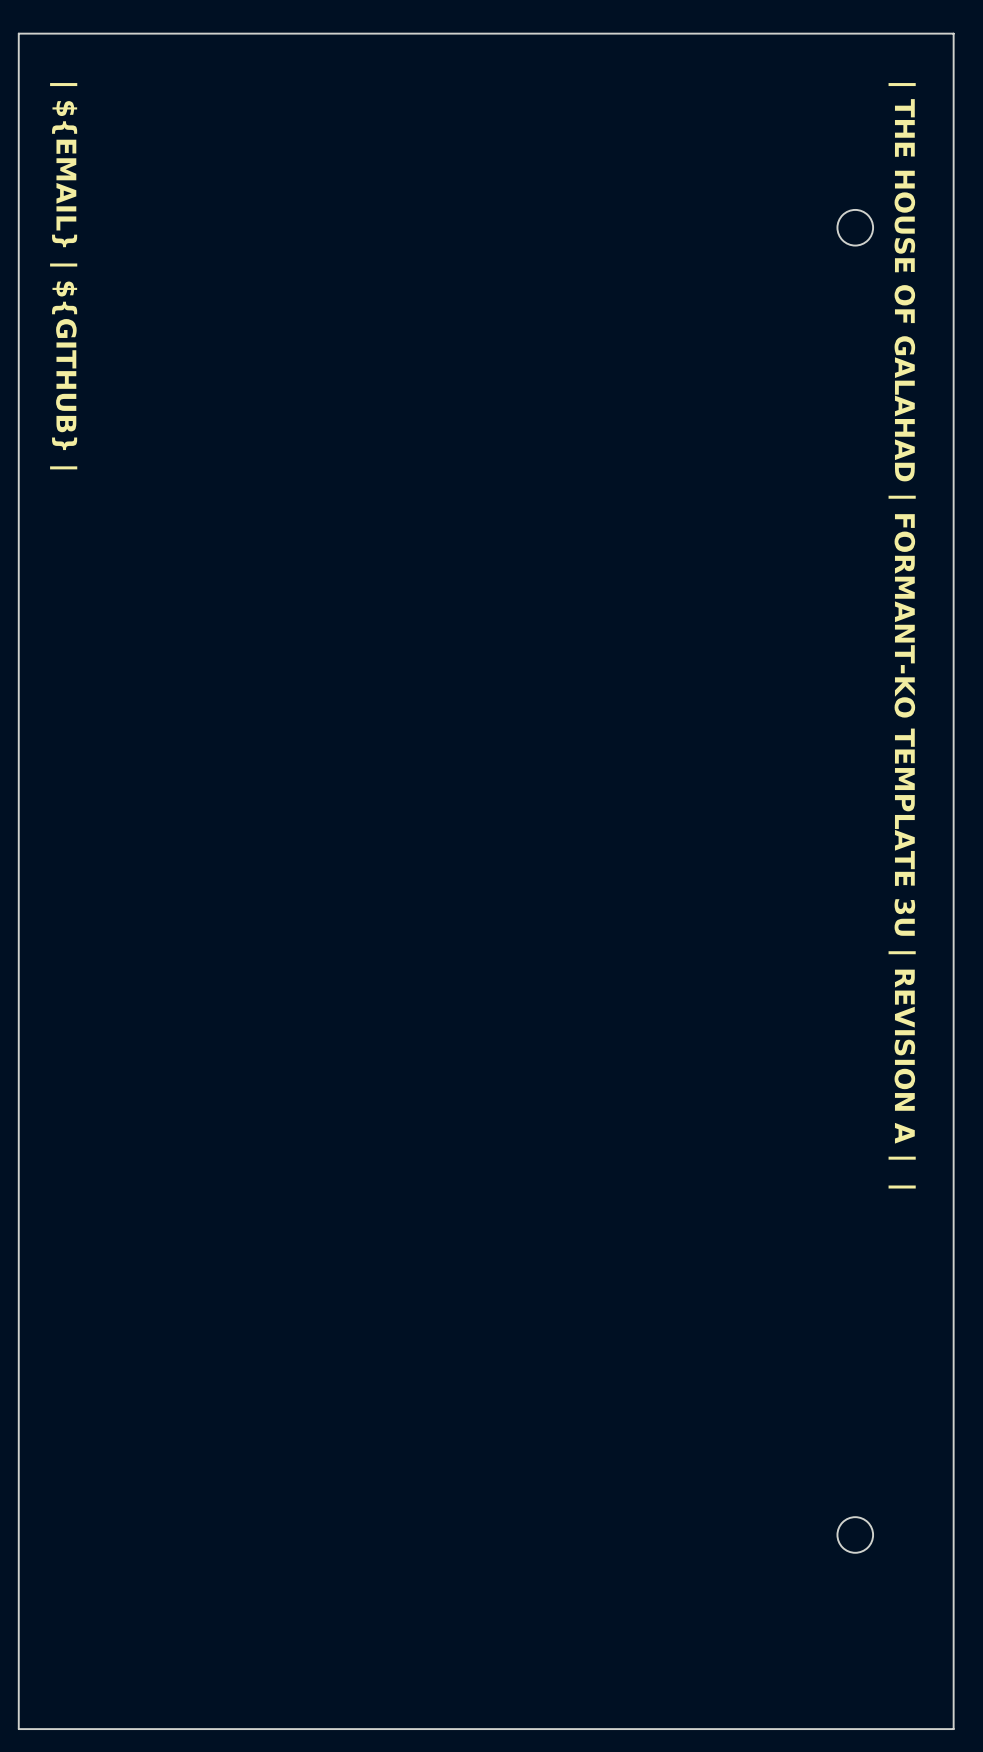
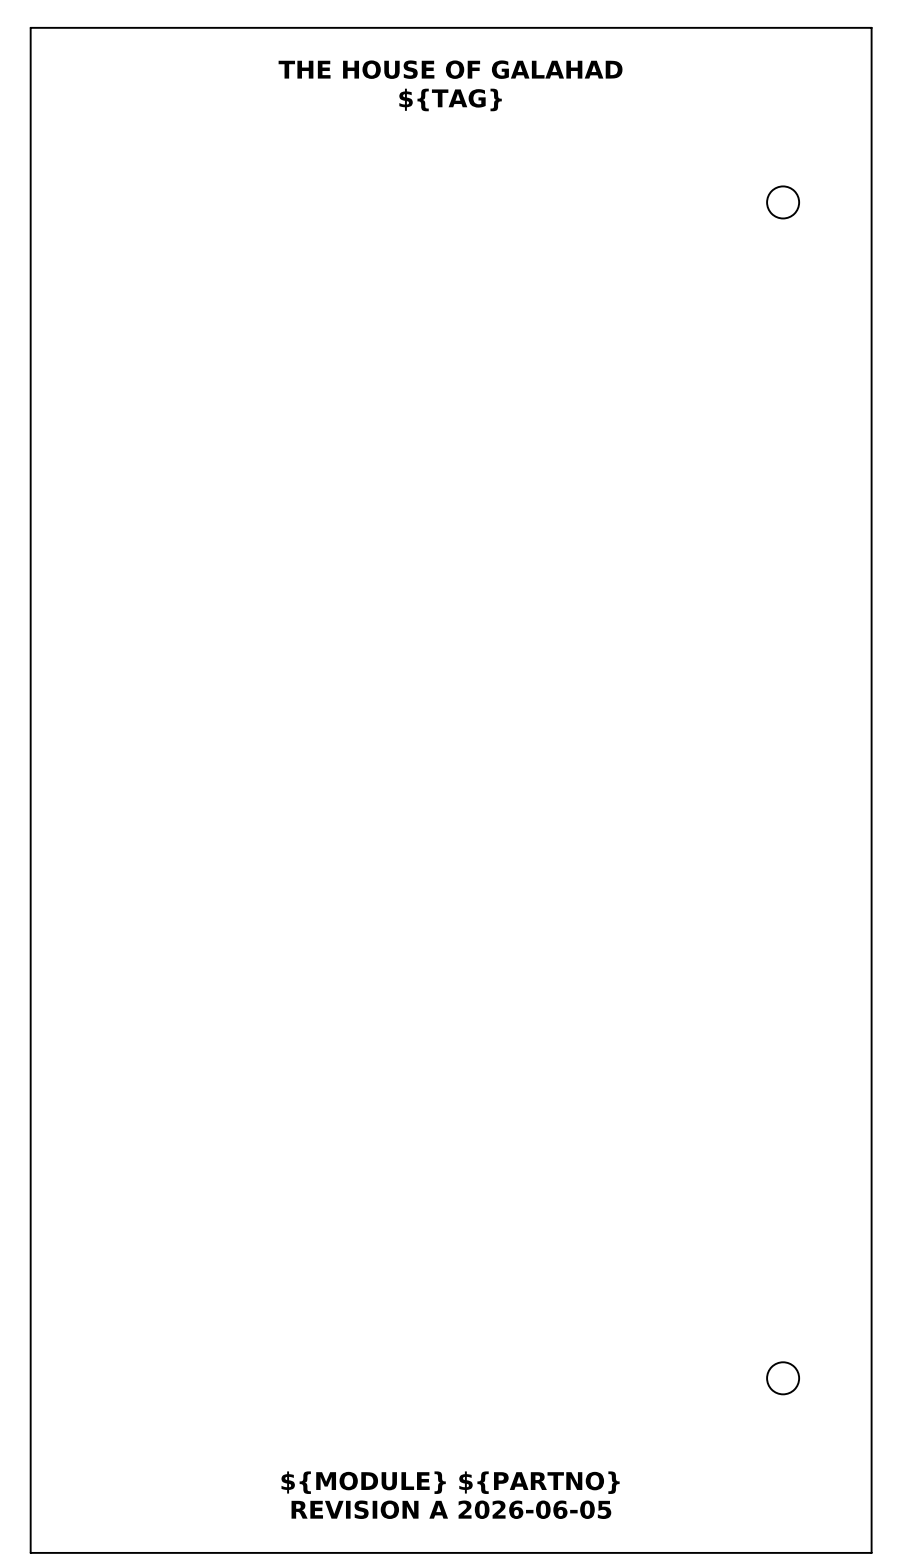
text: none -> THE HOUSE OF GALAHAD (450, 69)
text: none -> ${TAG} (450, 99)
text: | ${EMAIL} | ${GITHUB} | (63, 276) -> none
text: | THE HOUSE OF GALAHAD | FORMANT-KO TEMPLATE 3U | REVISION A | | (902, 635) -> none
text: none -> ${MODULE} ${PARTNO} (450, 1482)
text: none -> REVISION A 2026-06-05 (451, 1509)

